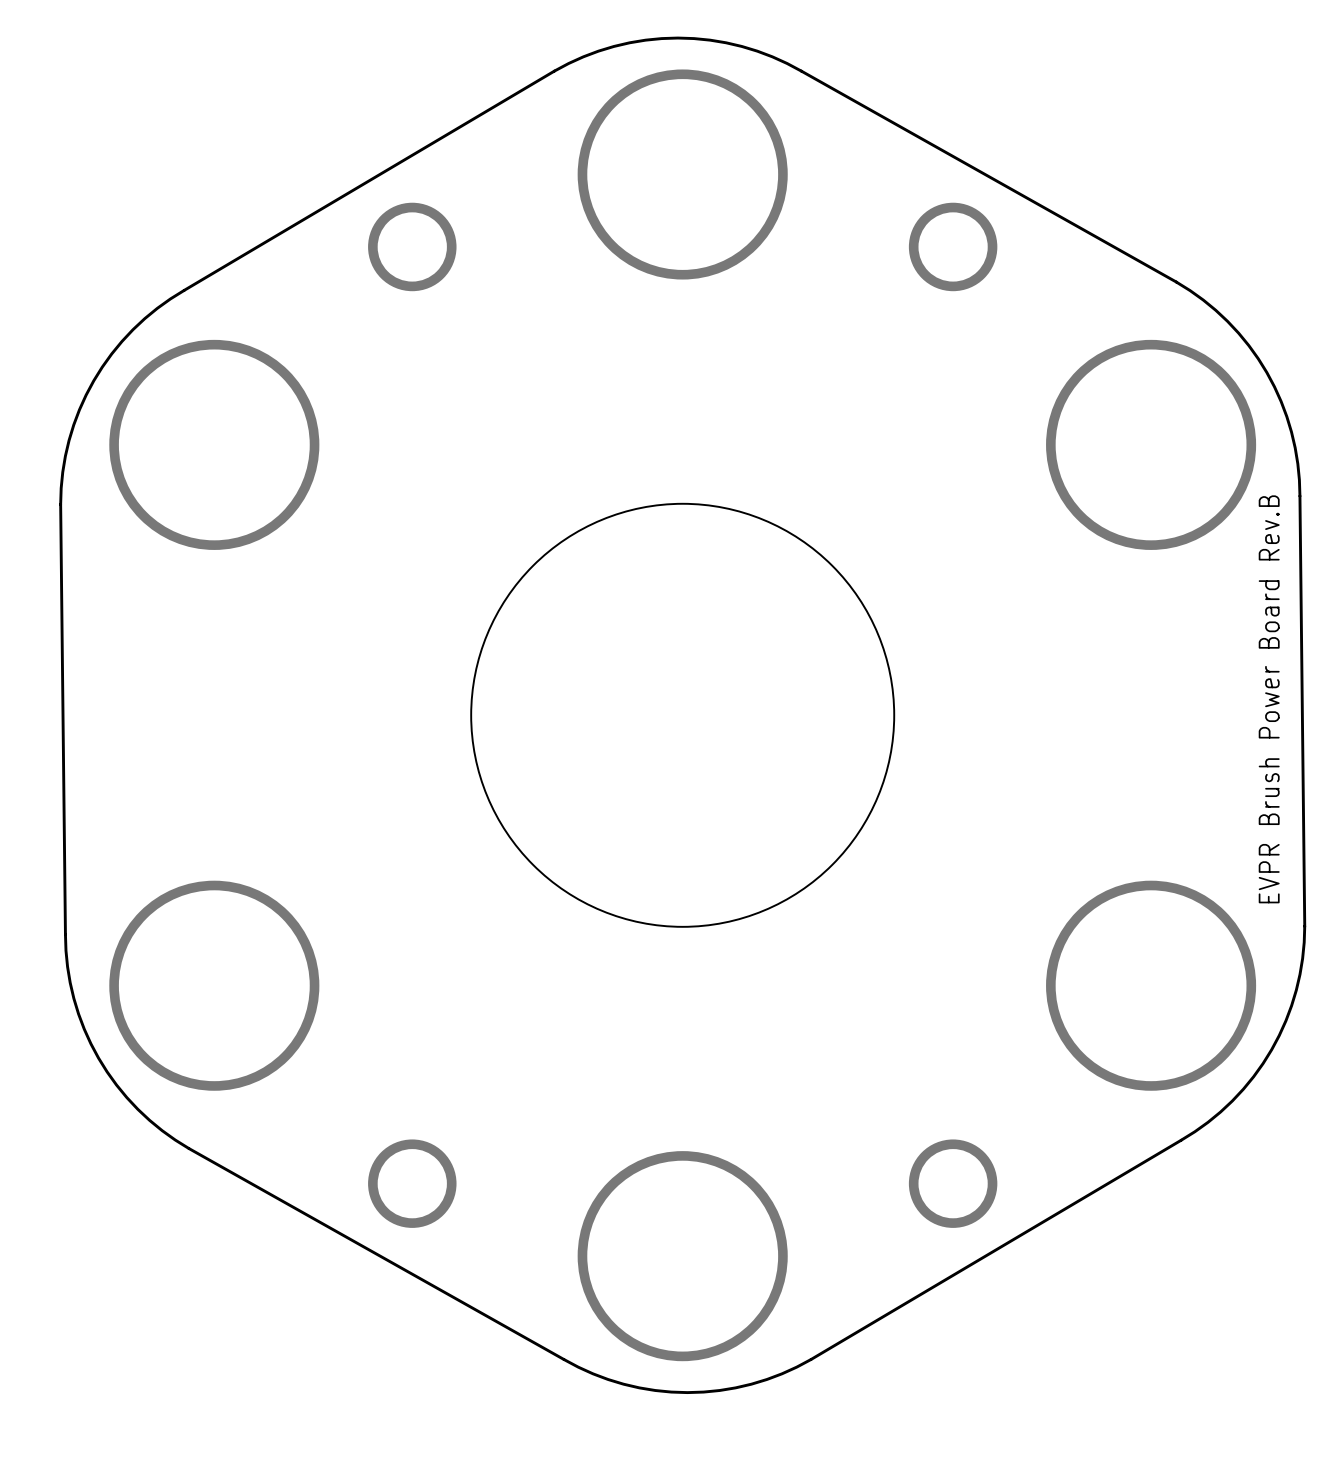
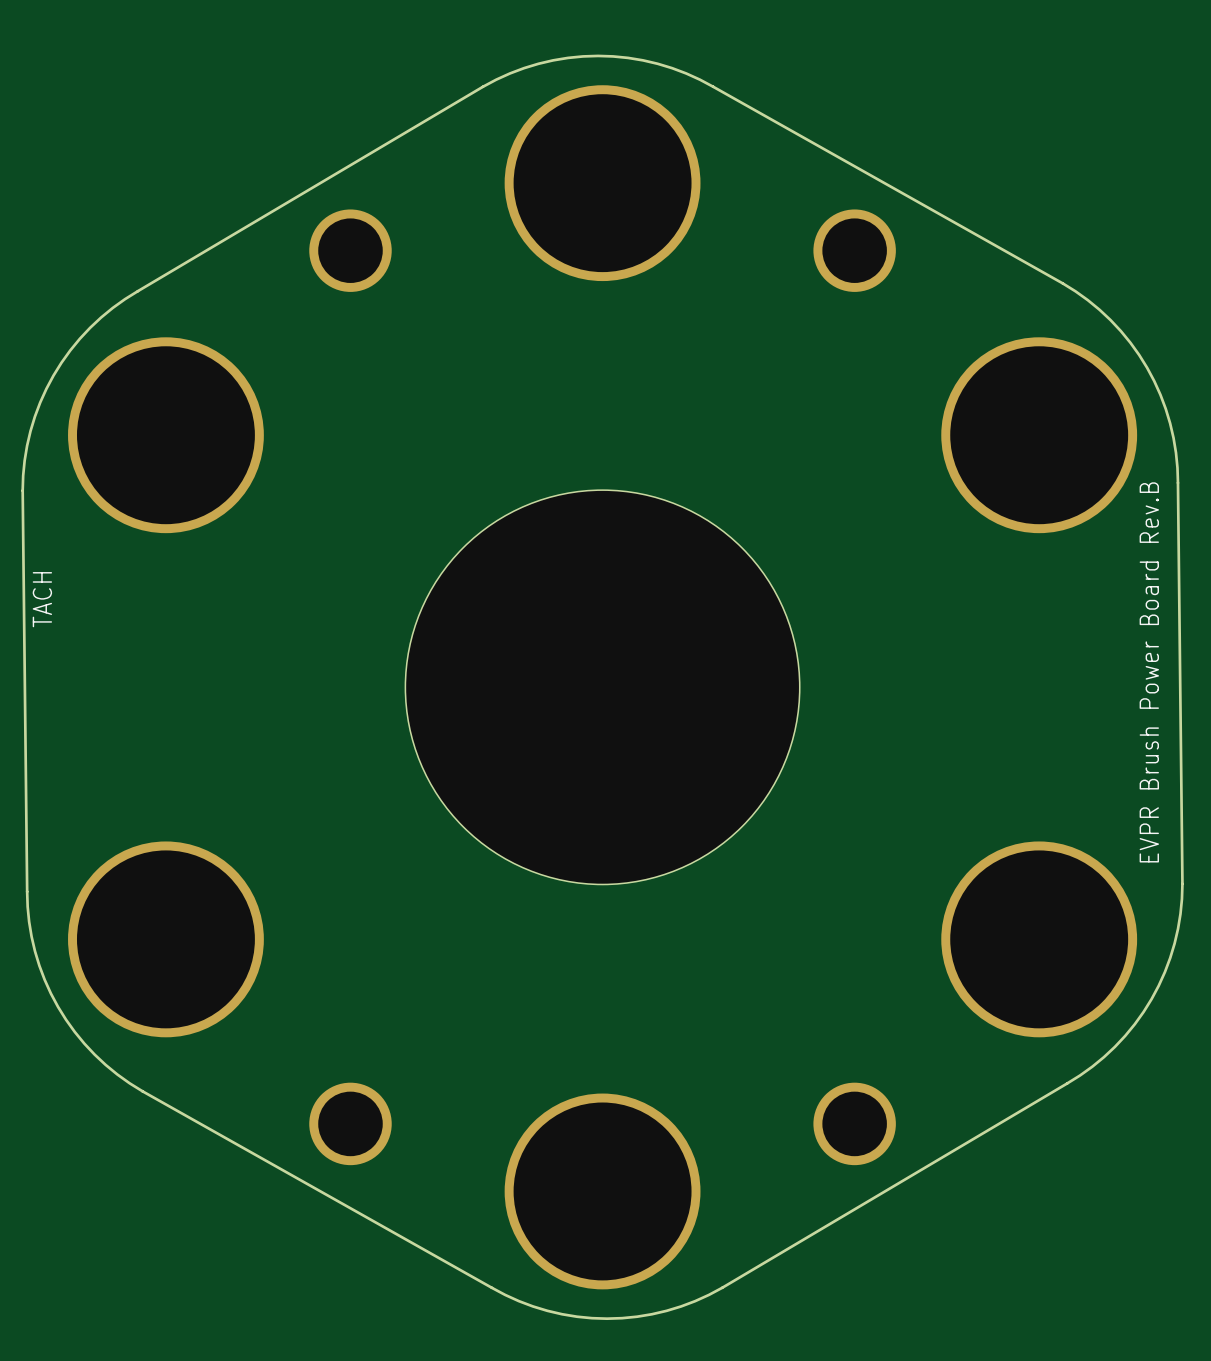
text: none -> TACH (42, 599)

